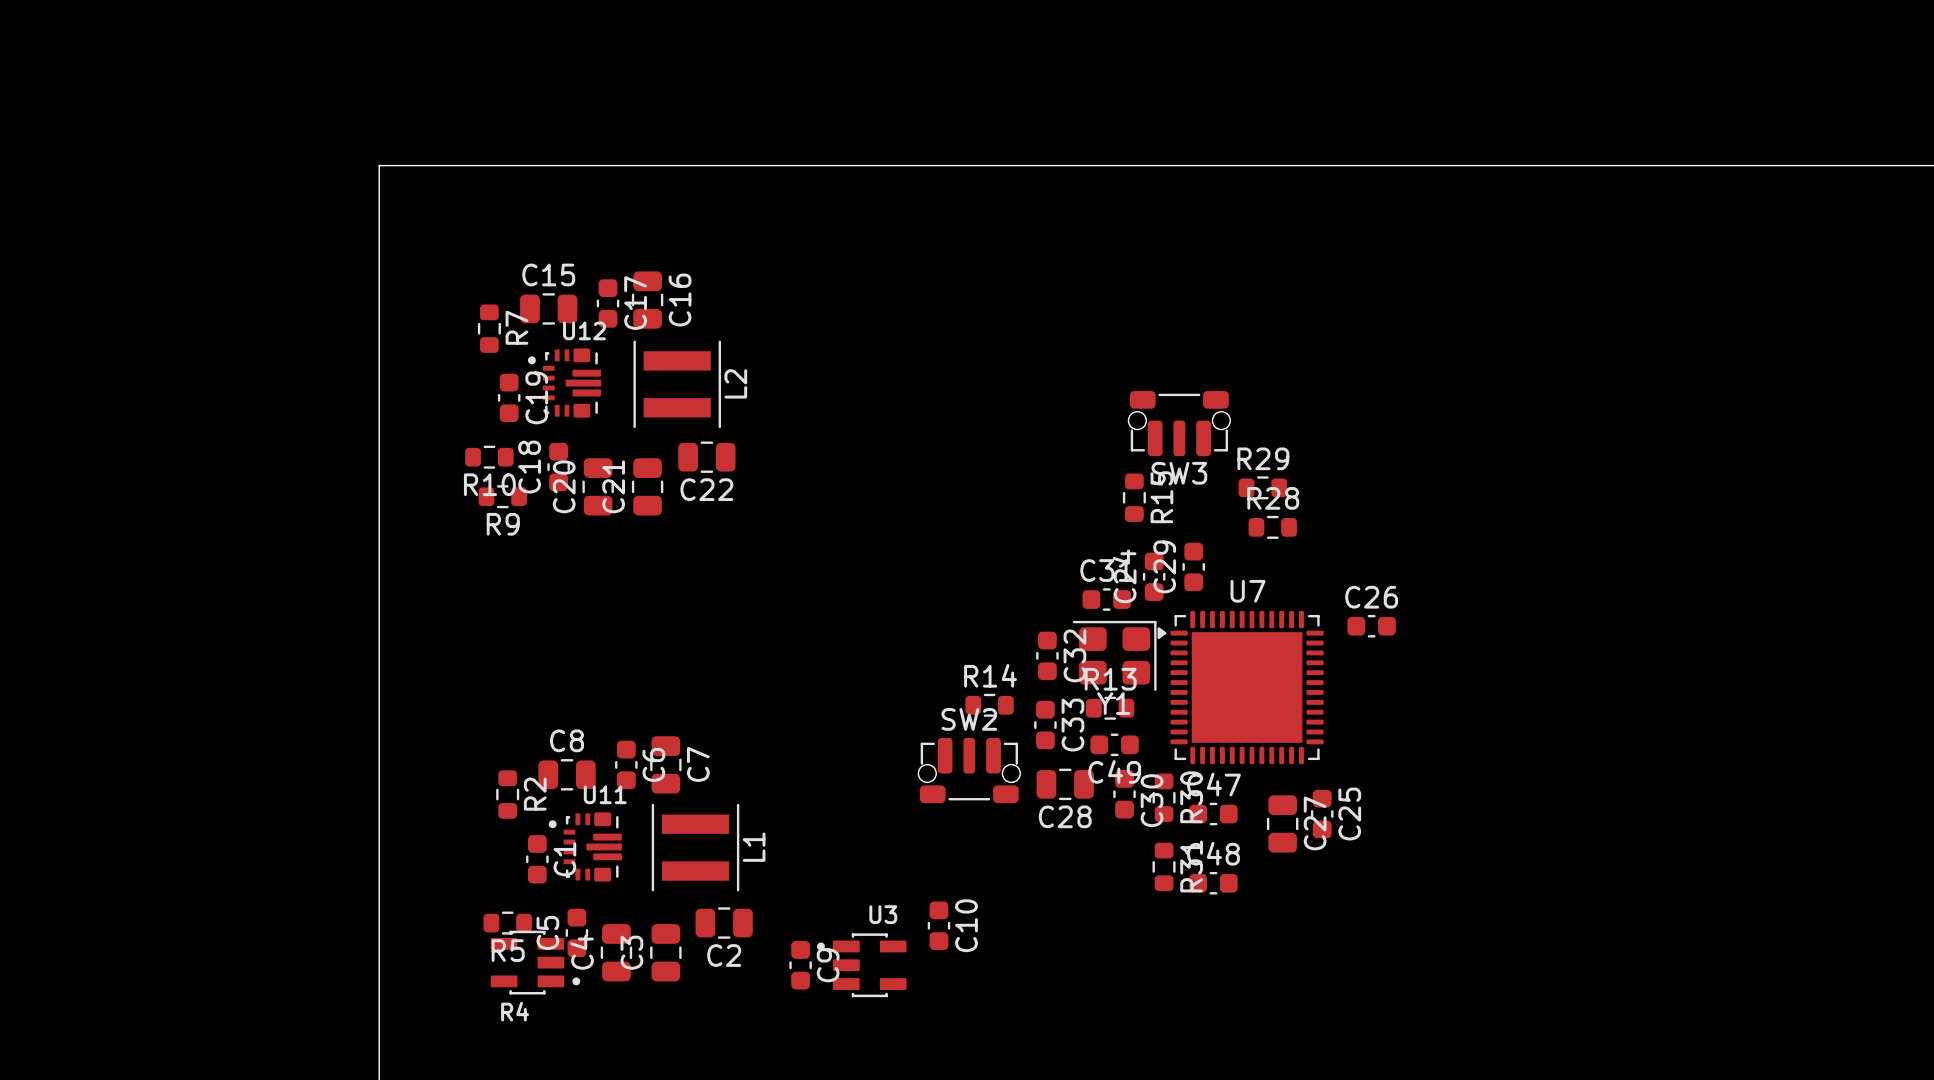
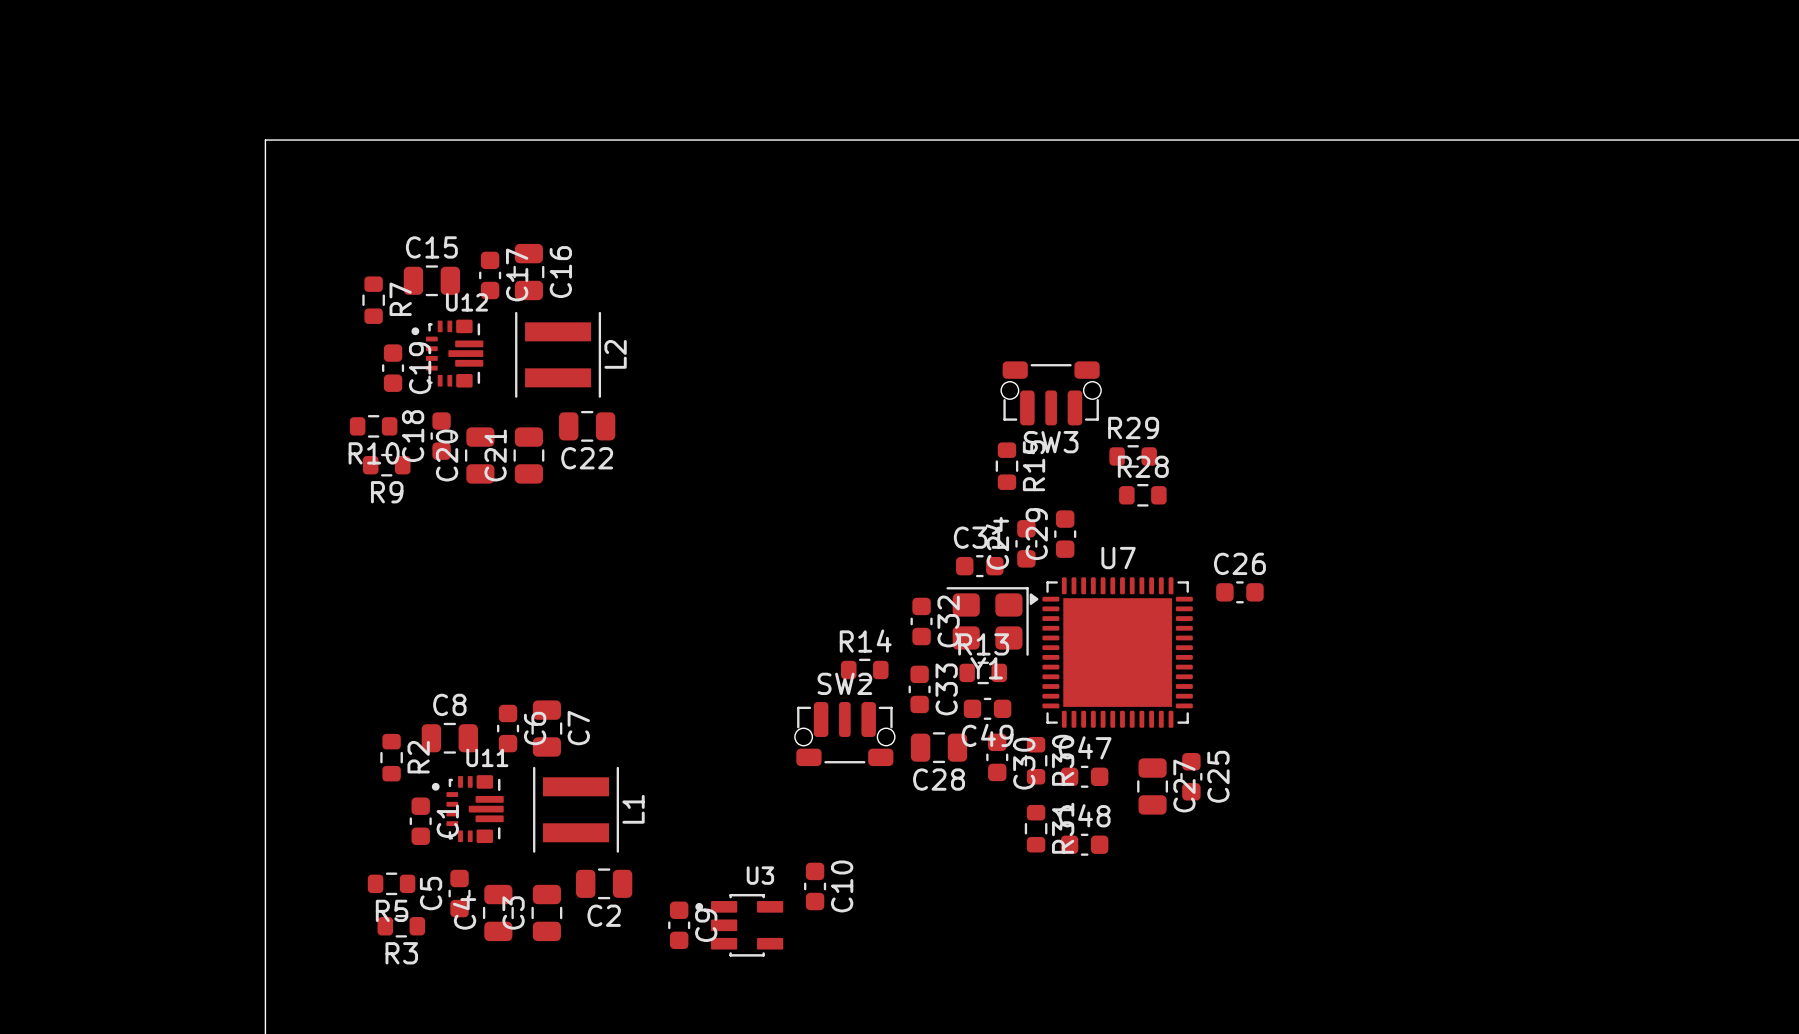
R4: (535, 962) -> none
R3: none -> (401, 926)

